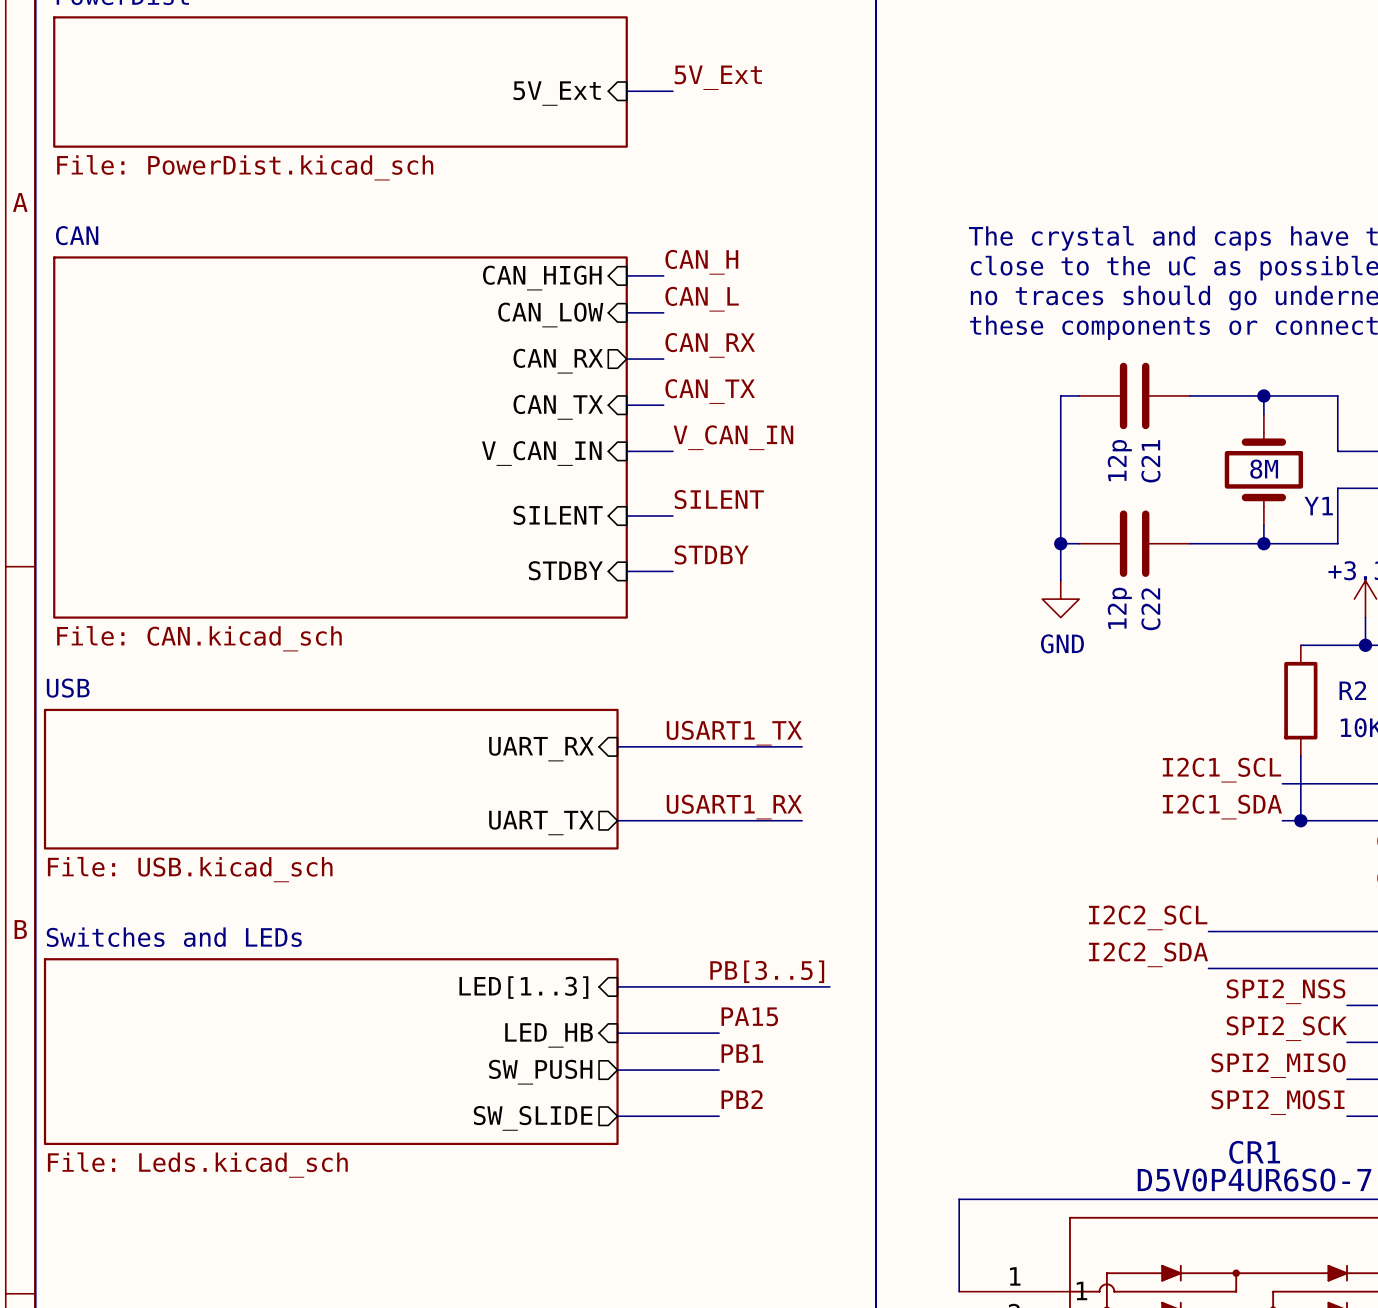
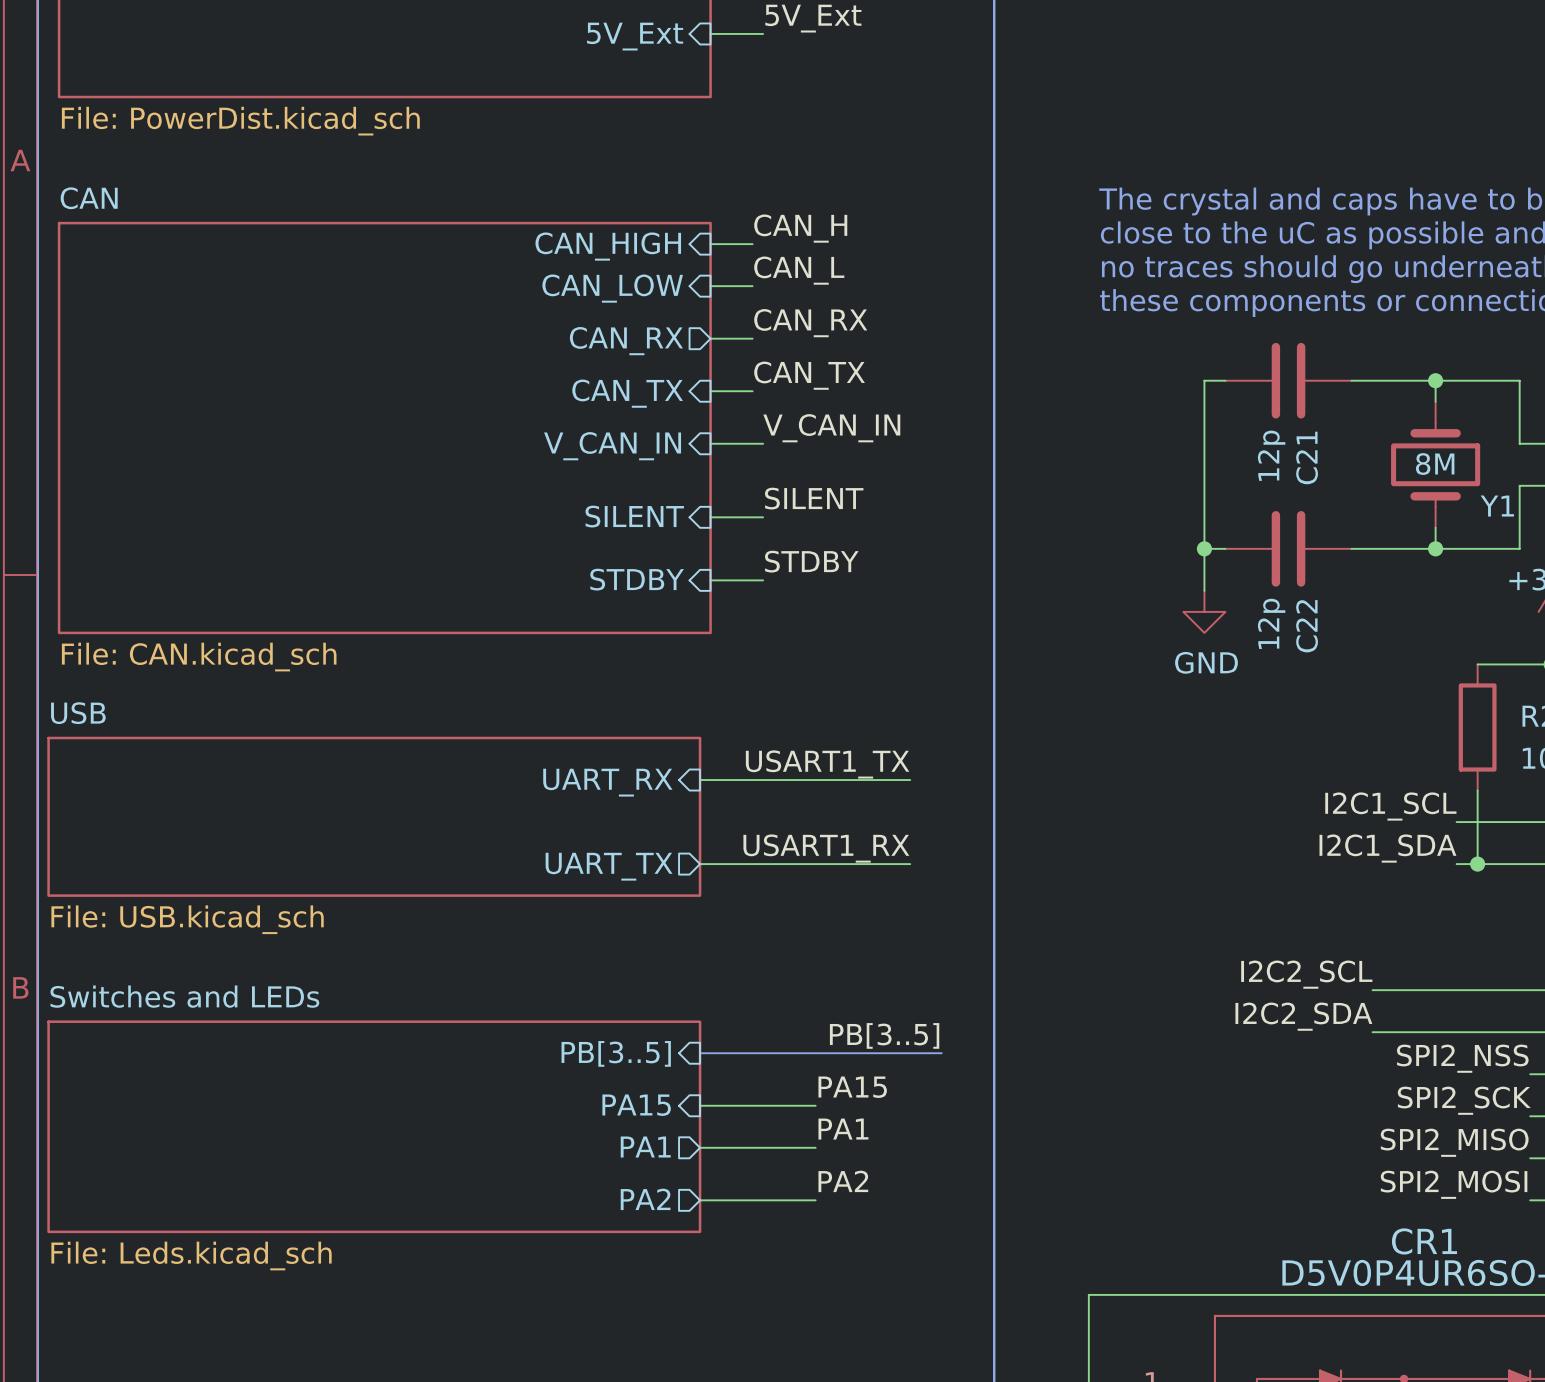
sheet pin: LED[1..3] (523, 987) -> PB[3..5] (616, 1053)
sheet pin: LED_HB (549, 1035) -> PA15 (636, 1105)
label: PB1 (742, 1053) -> PA1 (843, 1129)
sheet pin: SW_PUSH (540, 1072) -> PA1 (645, 1147)
label: PB2 (742, 1099) -> PA2 (843, 1181)
sheet pin: SW_SLIDE (533, 1118) -> PA2 (645, 1199)

